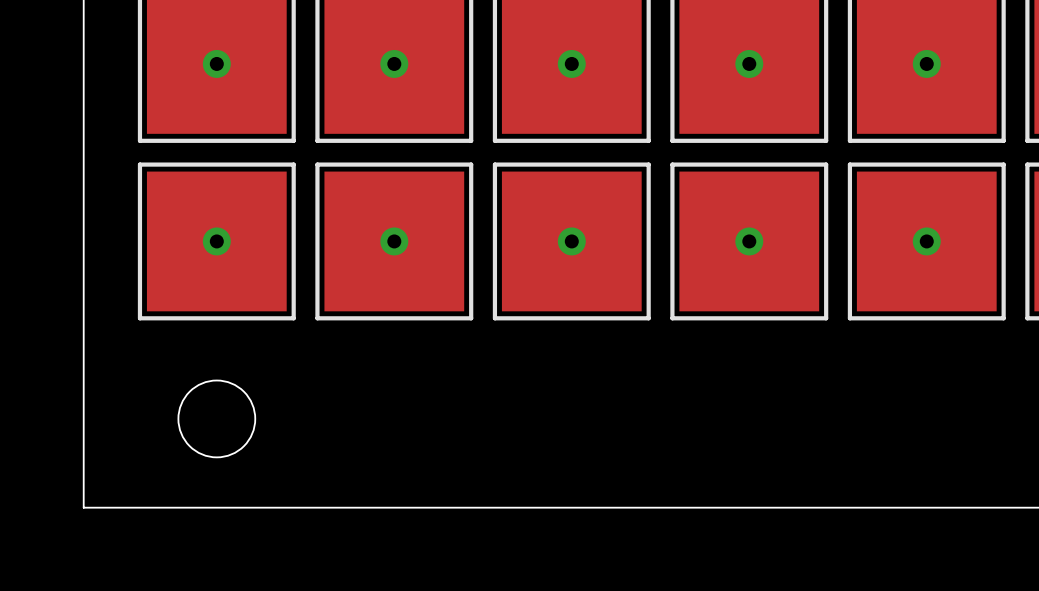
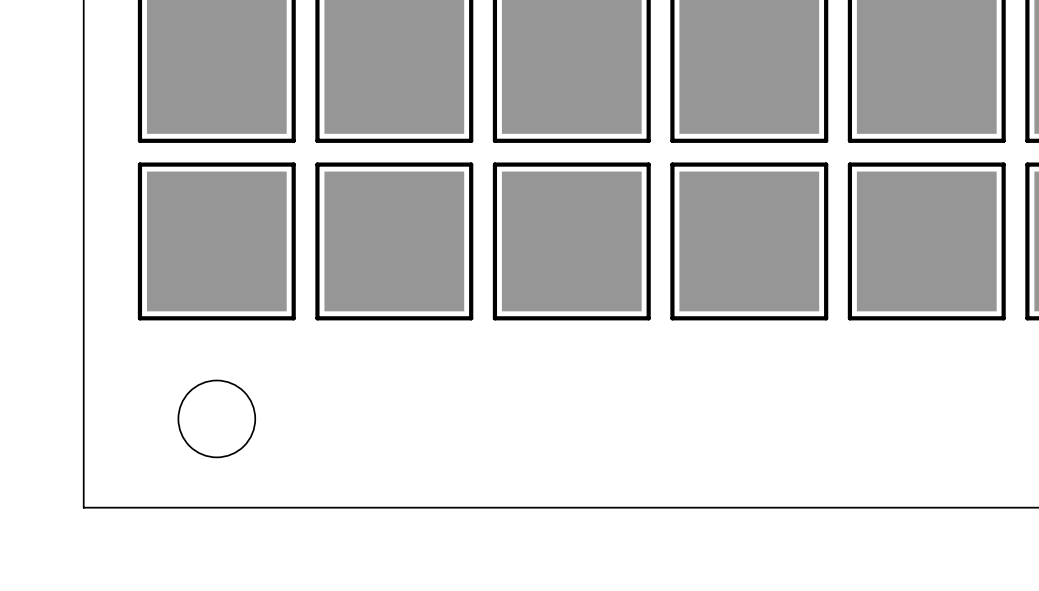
via: (216, 63) -> none
via: (394, 63) -> none
via: (571, 63) -> none
via: (749, 63) -> none
via: (926, 63) -> none
via: (216, 241) -> none
via: (394, 241) -> none
via: (571, 241) -> none
via: (749, 241) -> none
via: (926, 241) -> none

